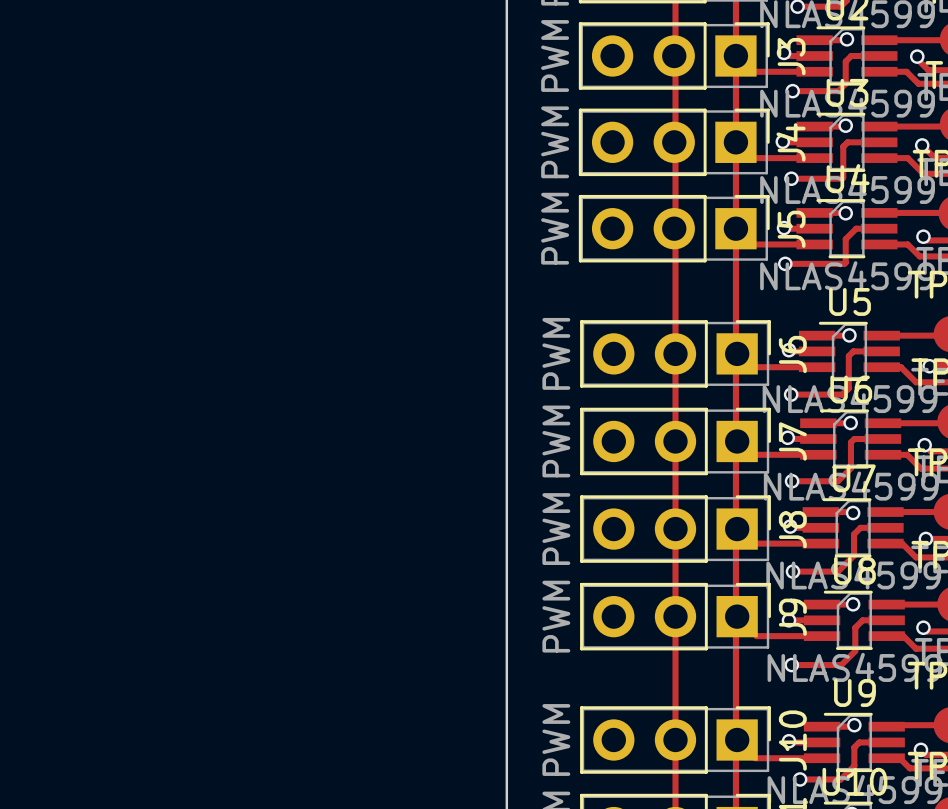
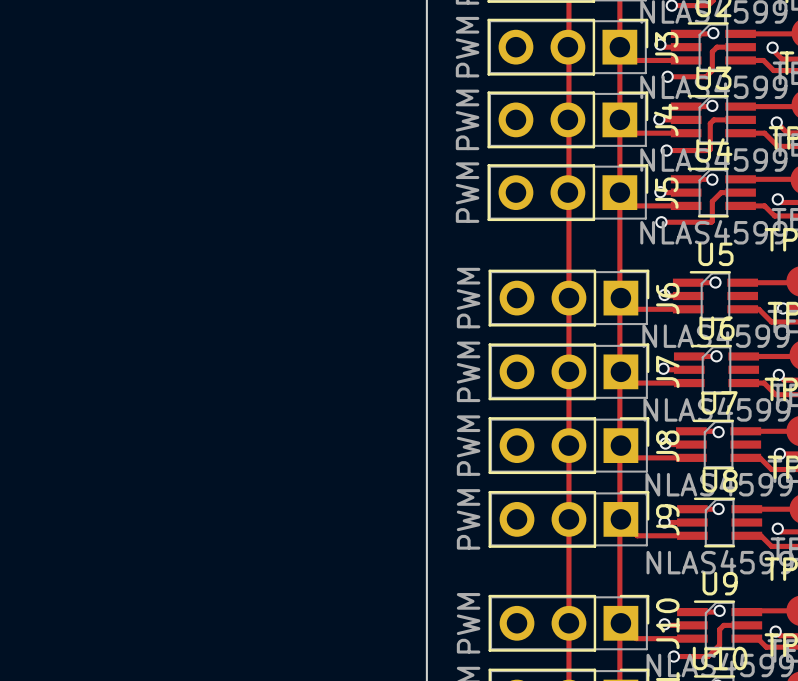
track: (881, 351) (853, 351) (848, 356) (848, 388) (842, 394) (791, 394) -> none
via: (791, 394) -> none
track: (882, 439) (854, 439) (850, 442) (850, 468) (838, 481) (792, 481) -> none
via: (792, 481) -> none
track: (885, 527) (860, 527) (854, 534) (854, 555) (838, 571) (792, 571) -> none
via: (792, 571) -> none
track: (886, 620) (862, 620) (855, 627) (855, 651) (841, 665) (791, 665) -> none
via: (791, 665) -> none

